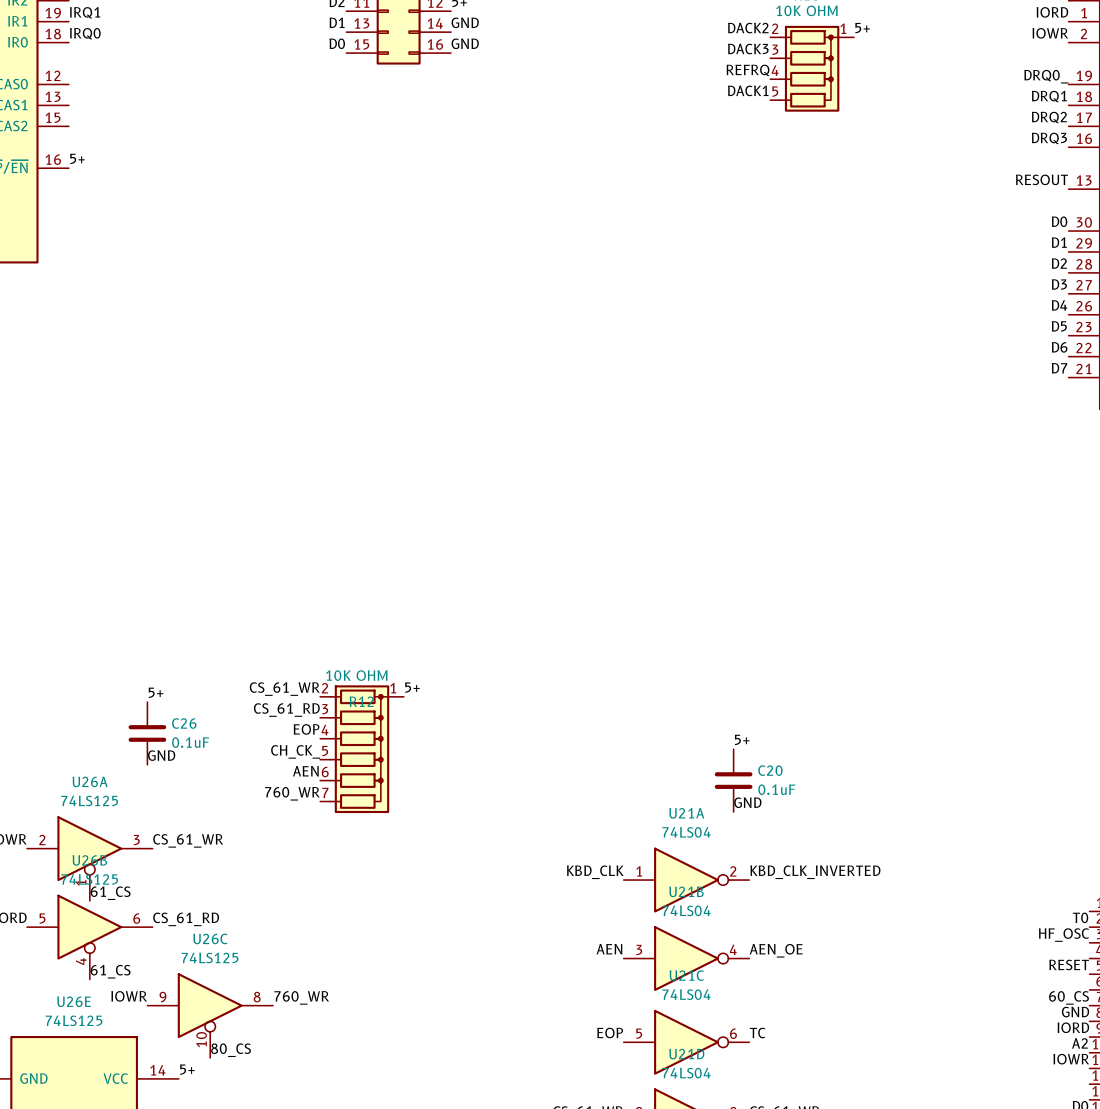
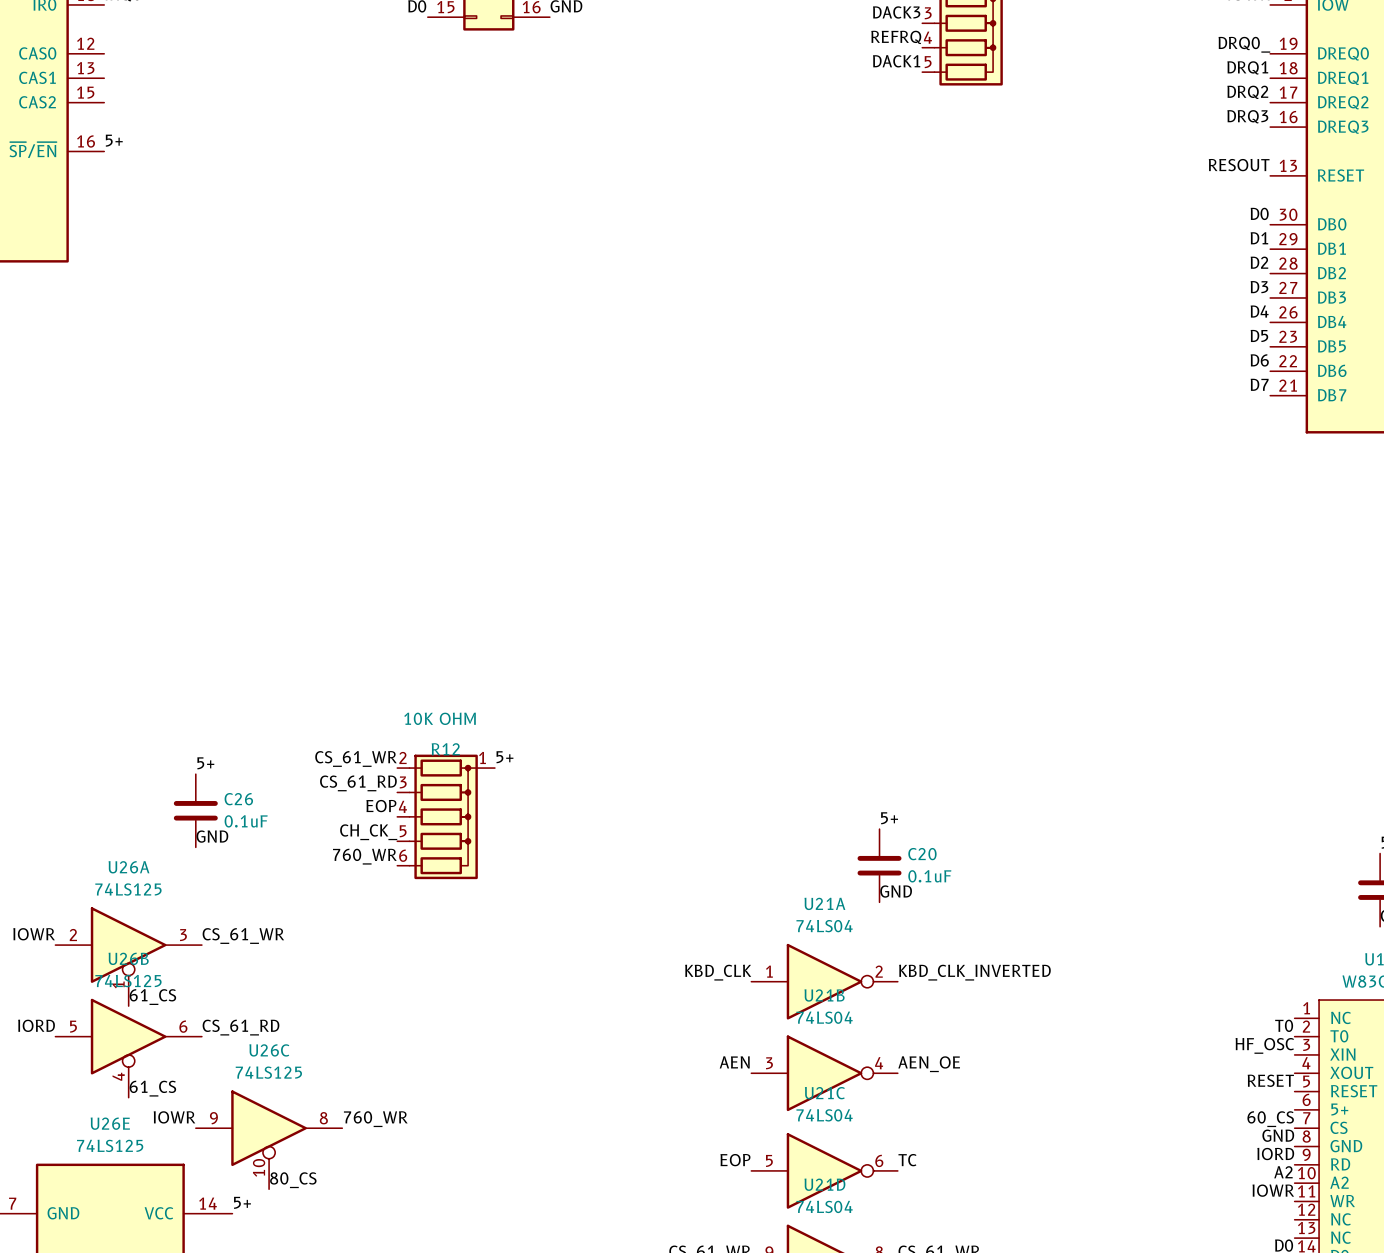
R12 symbol: [320, 685, 404, 814] -> [397, 754, 495, 880]
label: AEN (305, 771) -> 760_WR (364, 856)
label: 760_WR (292, 793) -> none

